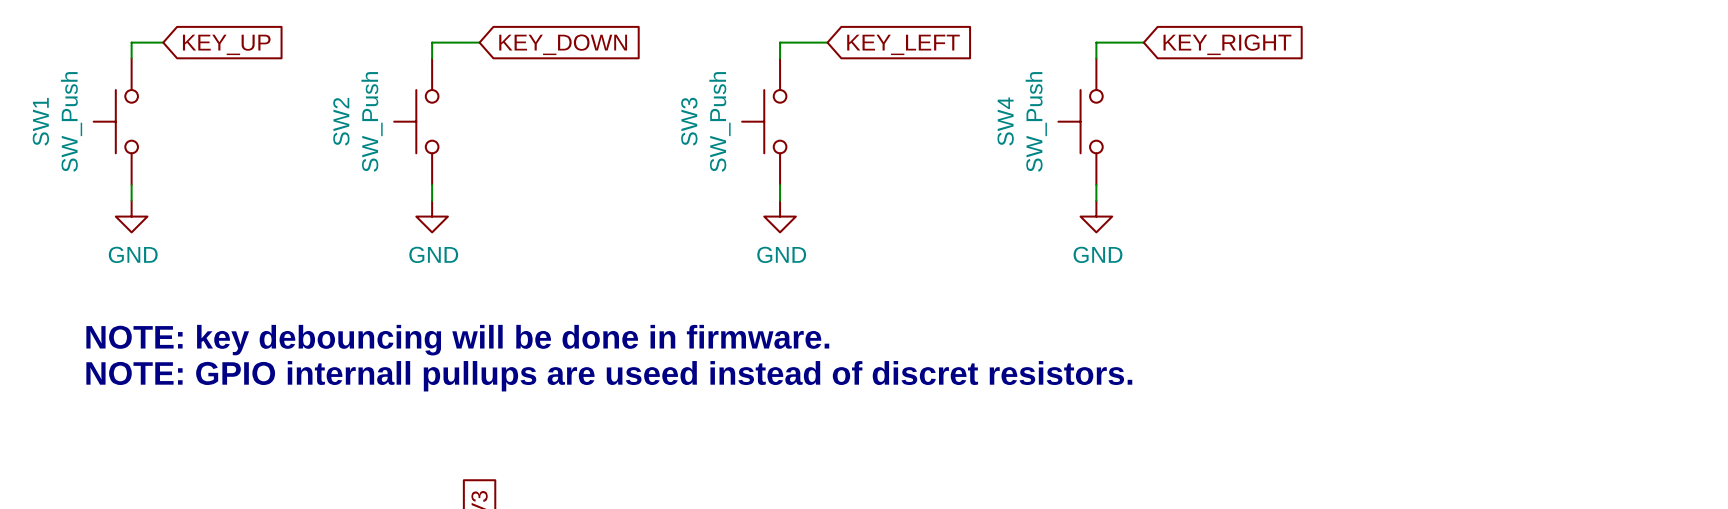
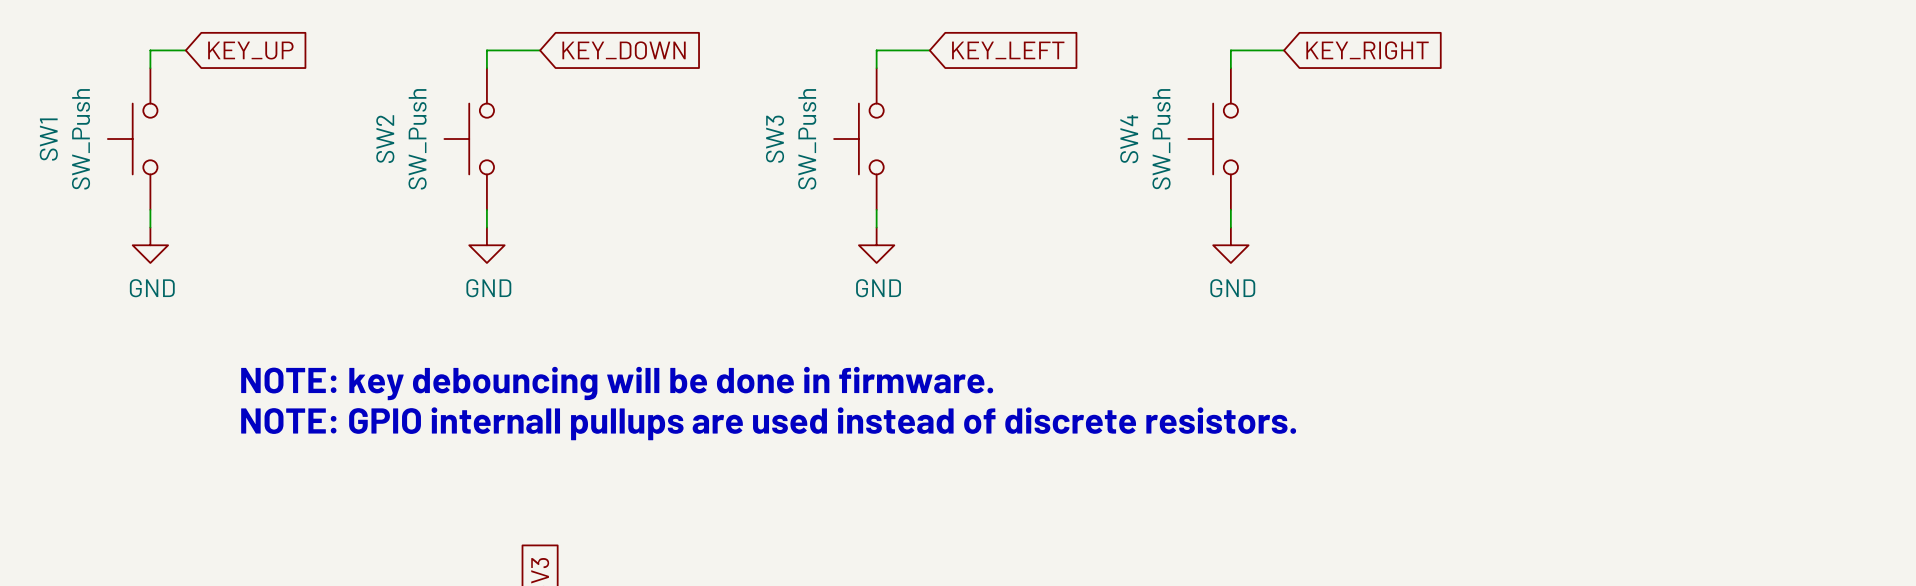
text position: NOTE: key debouncing will be done in firmware. (457, 340) -> NOTE: key debouncing will be done in firmware. (617, 383)
text: NOTE: GPIO internall pullups are useed instead of discret resistors. (609, 376) -> NOTE: GPIO internall pullups are used instead of discrete resistors. (768, 423)

